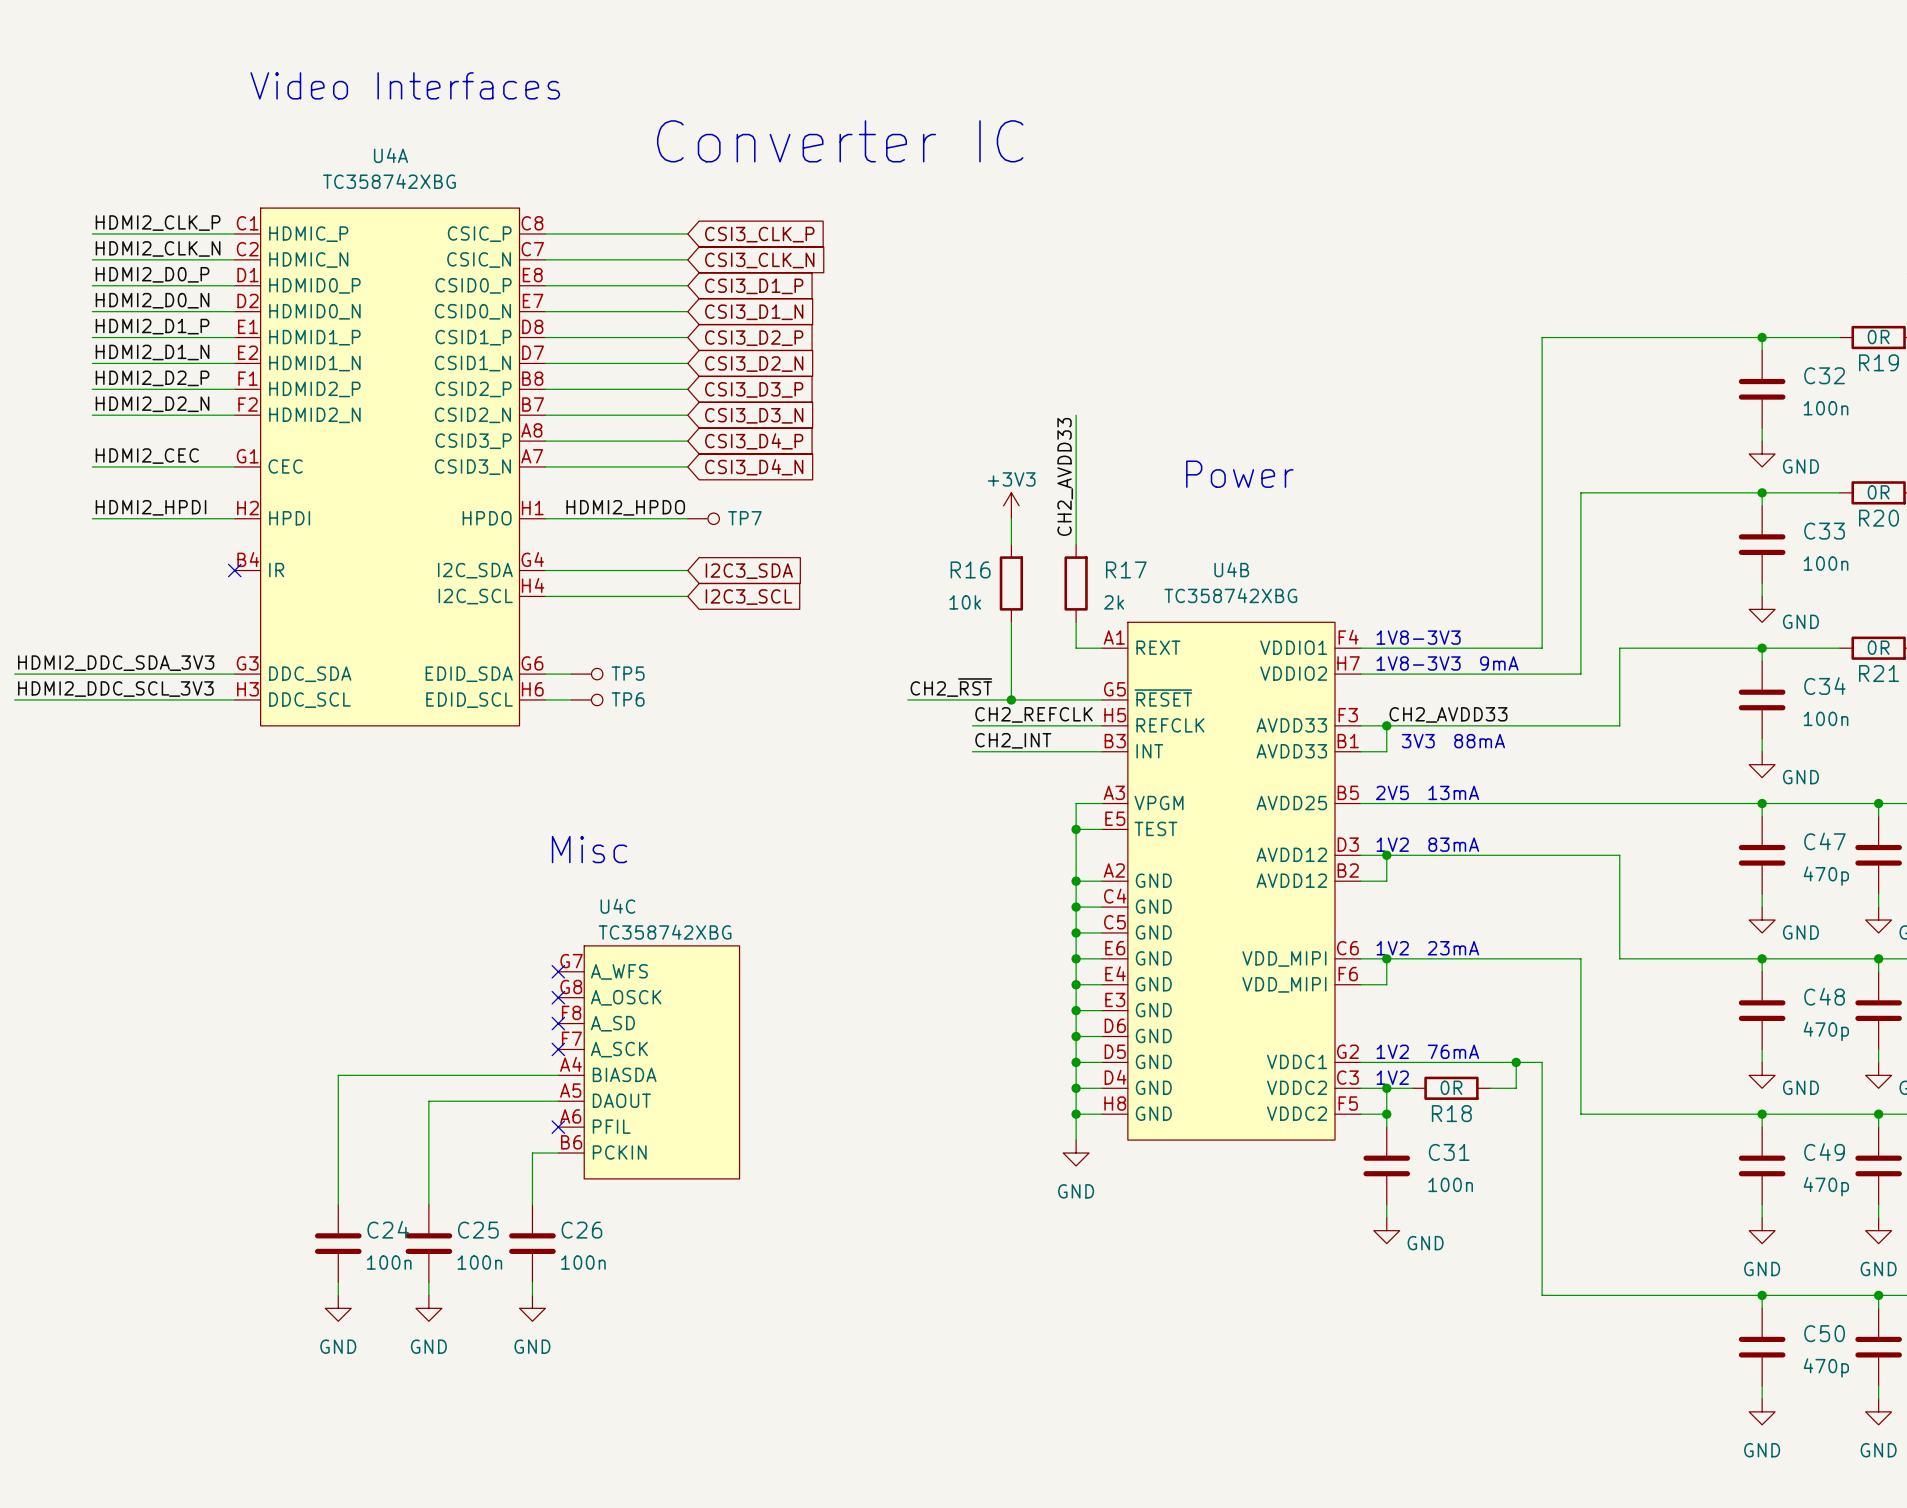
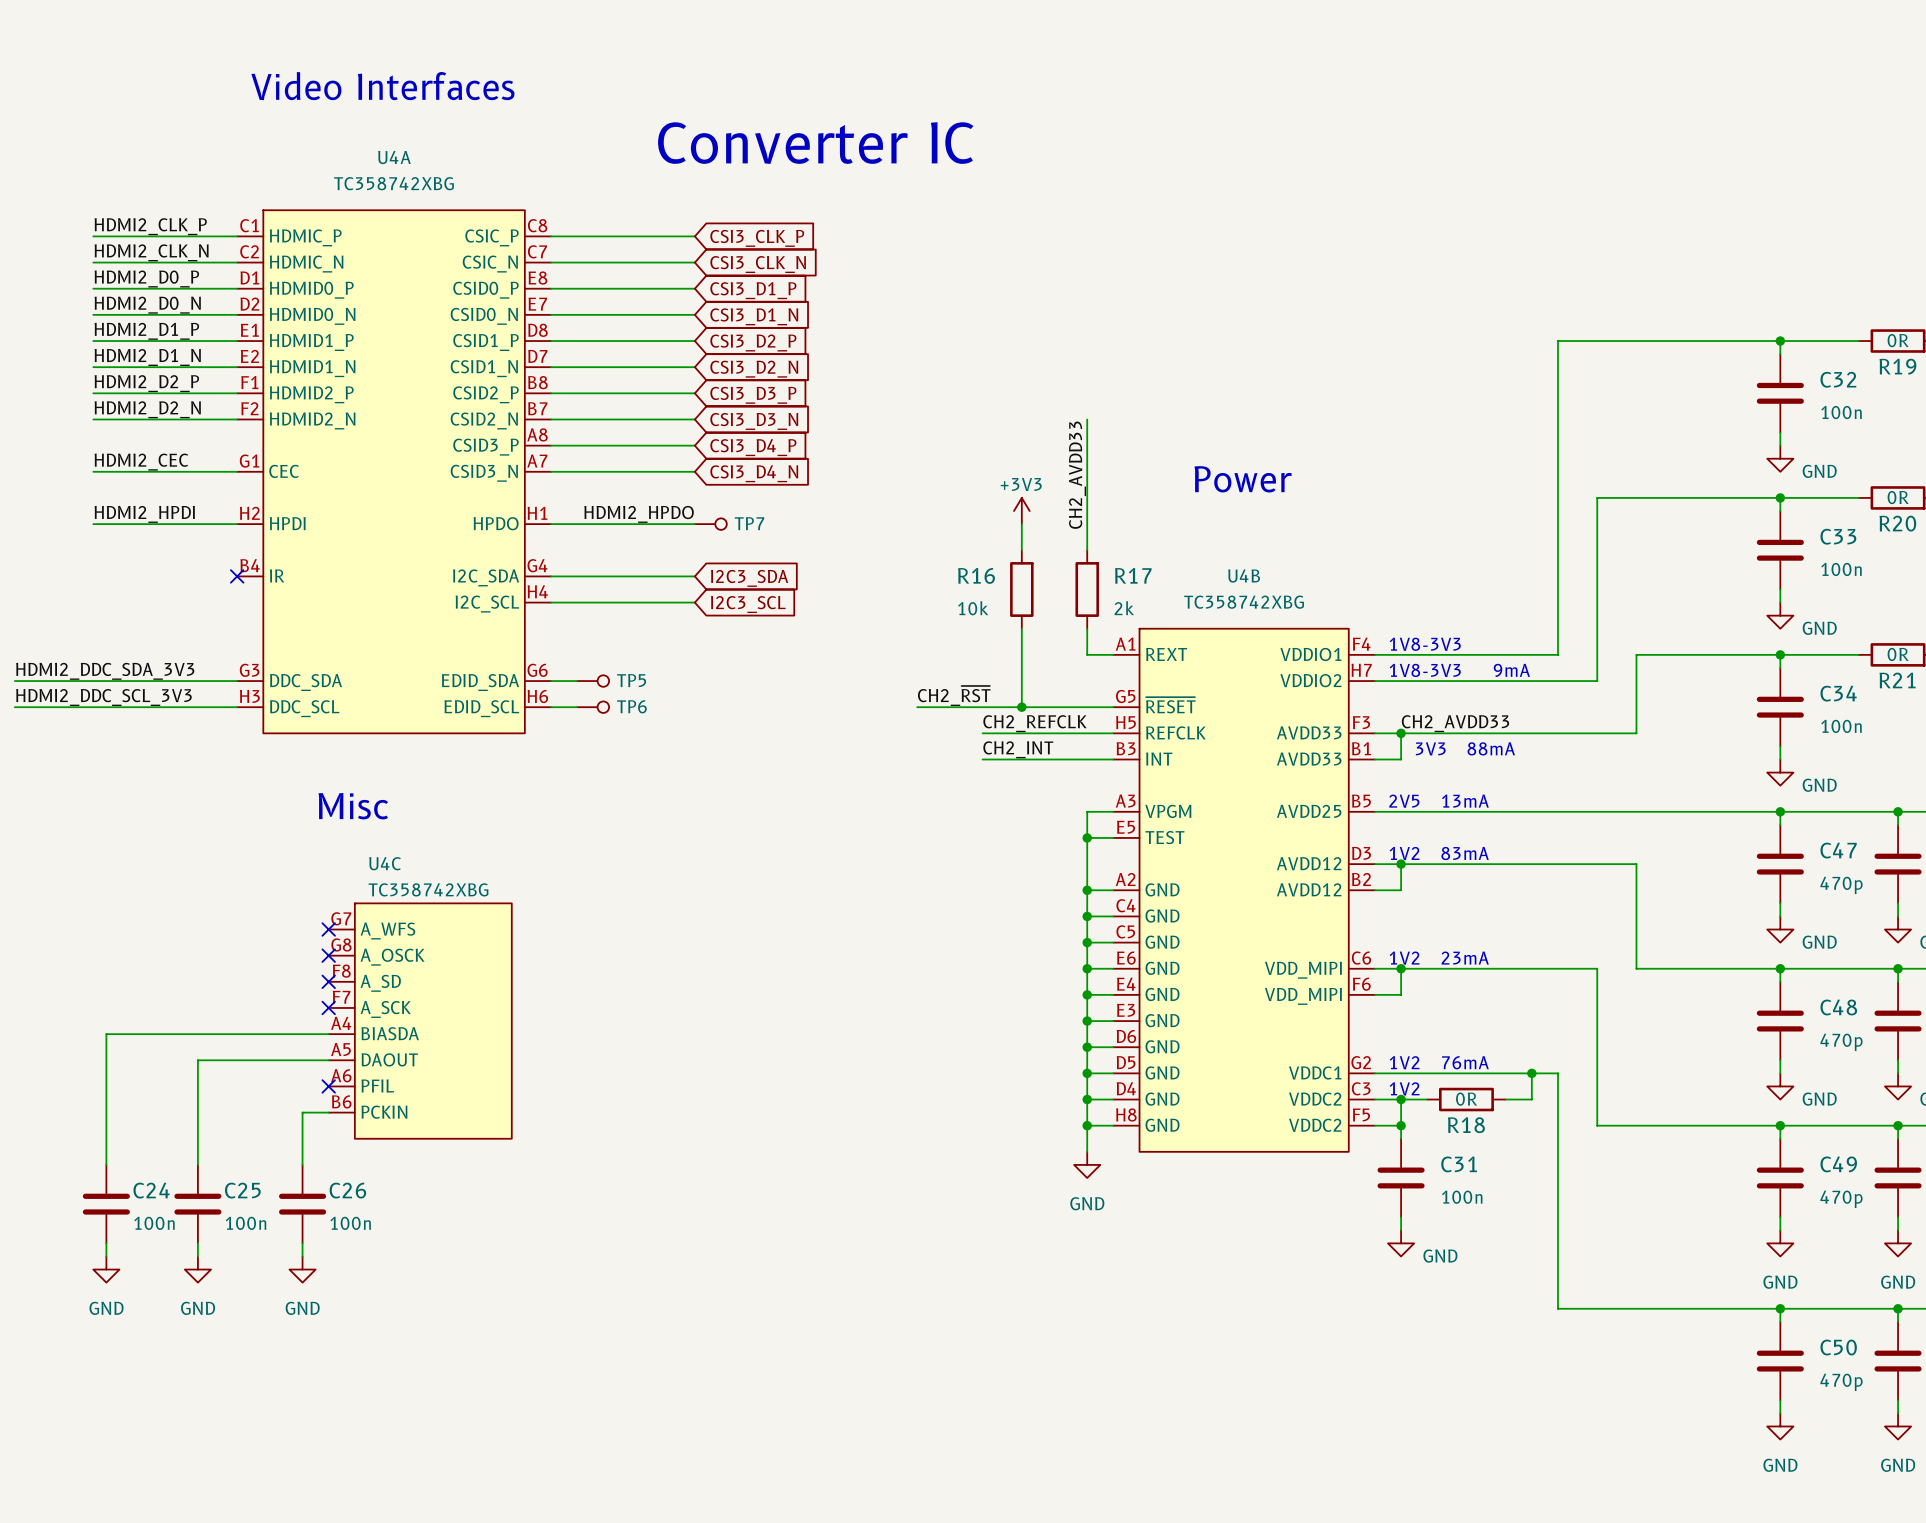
text position: Misc (589, 849) -> Misc (353, 806)
no-connect mark: none -> (328, 929)
no-connect mark: none -> (328, 955)
no-connect mark: none -> (328, 981)
no-connect mark: (558, 971) -> none
no-connect mark: none -> (328, 1007)
no-connect mark: (558, 997) -> none
no-connect mark: (558, 1023) -> none
no-connect mark: (558, 1049) -> none
U4C position: (648, 1062) -> (420, 1021)
no-connect mark: none -> (328, 1086)
wire: (558, 1075) (338, 1075) (338, 1204) -> (328, 1034) (106, 1034) (106, 1164)
wire: (558, 1101) (428, 1101) (428, 1204) -> (328, 1060) (197, 1060) (197, 1164)
no-connect mark: (558, 1127) -> none
wire: (558, 1153) (532, 1153) (532, 1204) -> (328, 1112) (302, 1112) (302, 1164)
C24 position: (338, 1243) -> (106, 1204)
C25 position: (428, 1243) -> (197, 1204)
C26 position: (532, 1243) -> (302, 1204)
power symbol: none -> GND (106, 1269)
power symbol: none -> GND (197, 1269)
wire: (338, 1282) (338, 1295) -> (106, 1243) (106, 1256)
wire: (428, 1282) (428, 1295) -> (197, 1243) (197, 1256)
wire: (532, 1282) (532, 1295) -> (302, 1243) (302, 1256)
power symbol position: GND (338, 1308) -> GND (302, 1269)
power symbol: GND (428, 1308) -> none
power symbol: GND (532, 1308) -> none

